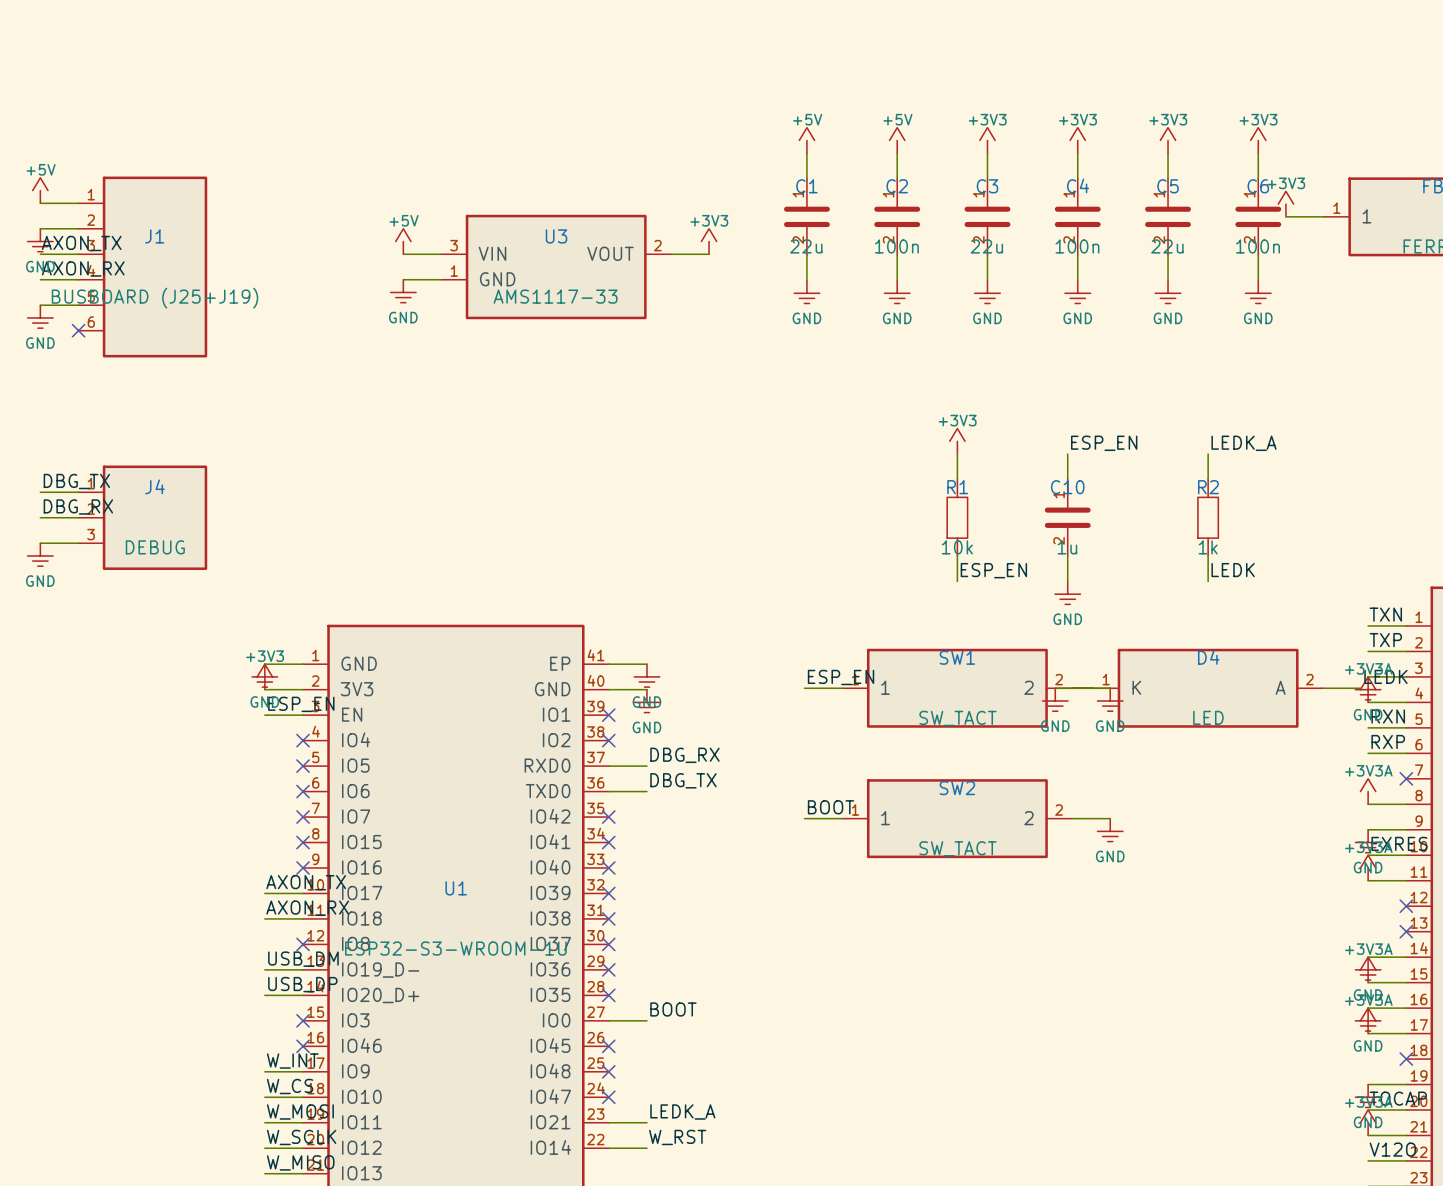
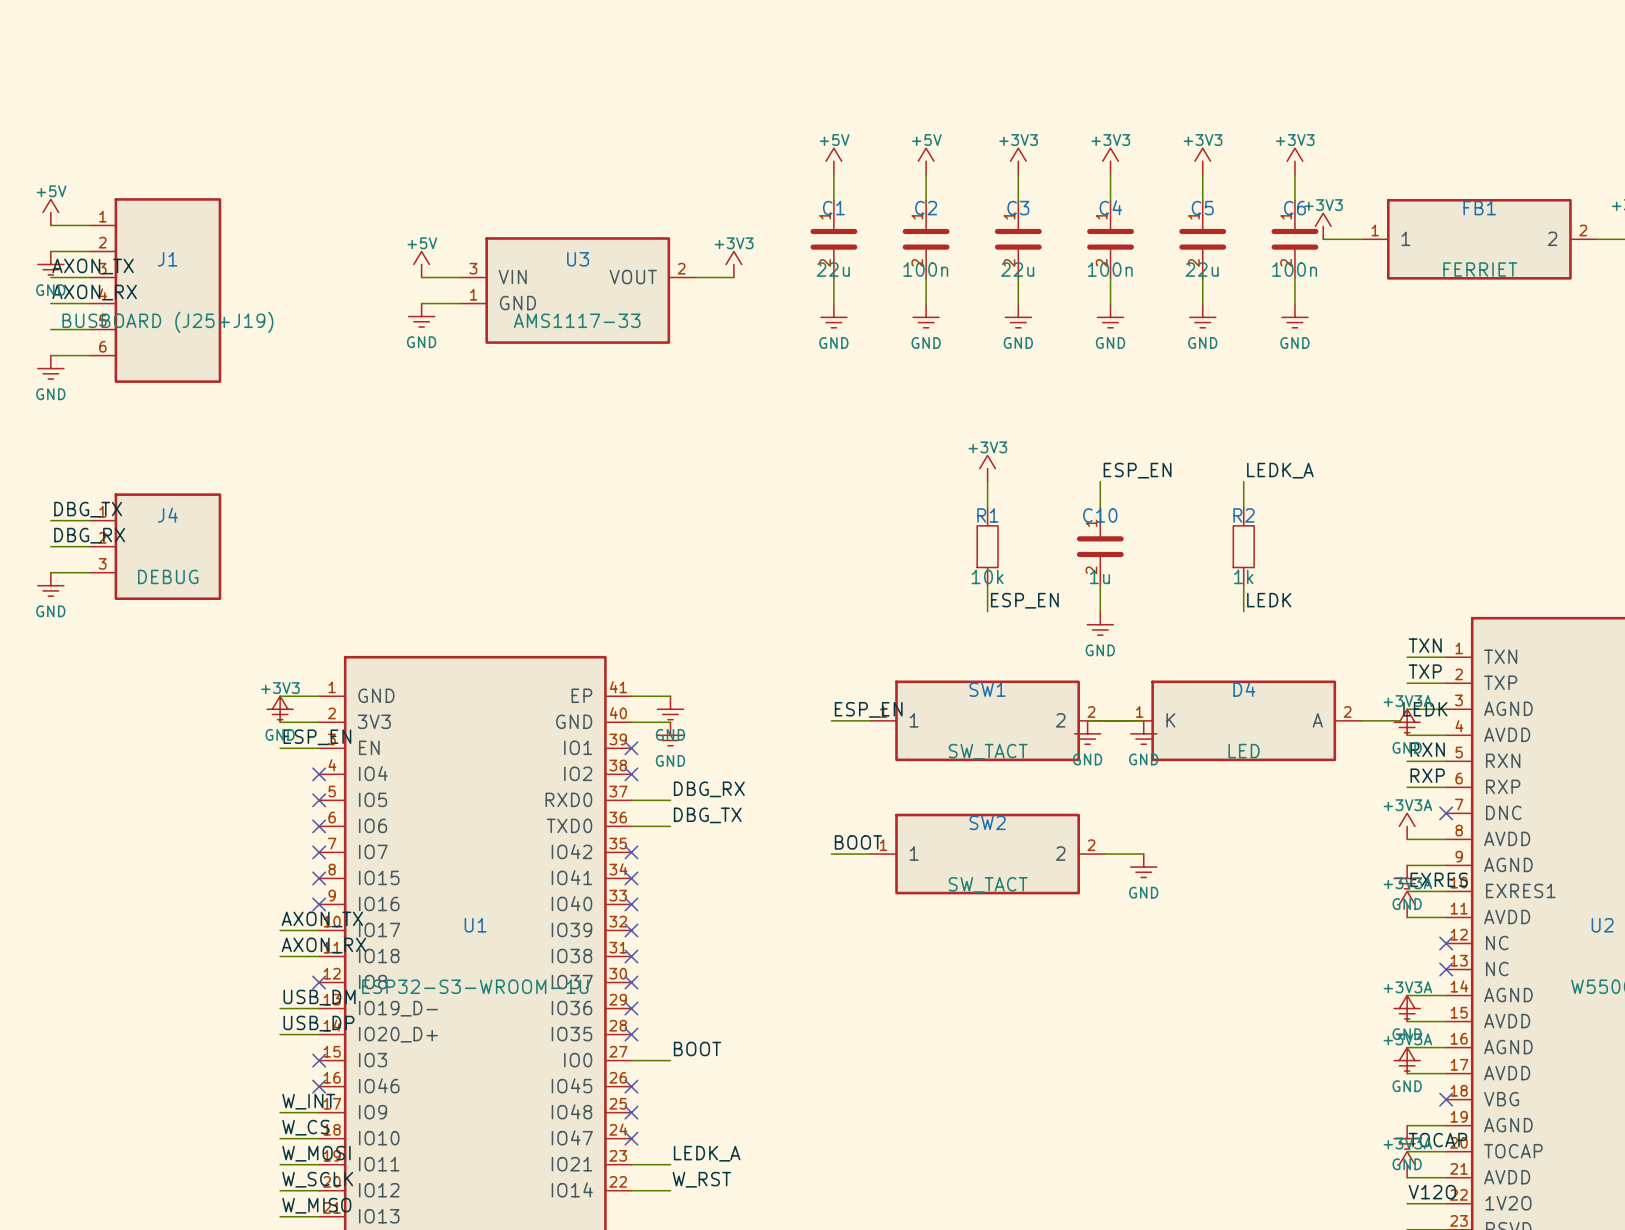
power symbol position: GND (40, 316) -> GND (50, 367)
wire: none -> (50, 355) (89, 355)
no-connect mark: (78, 330) -> none

